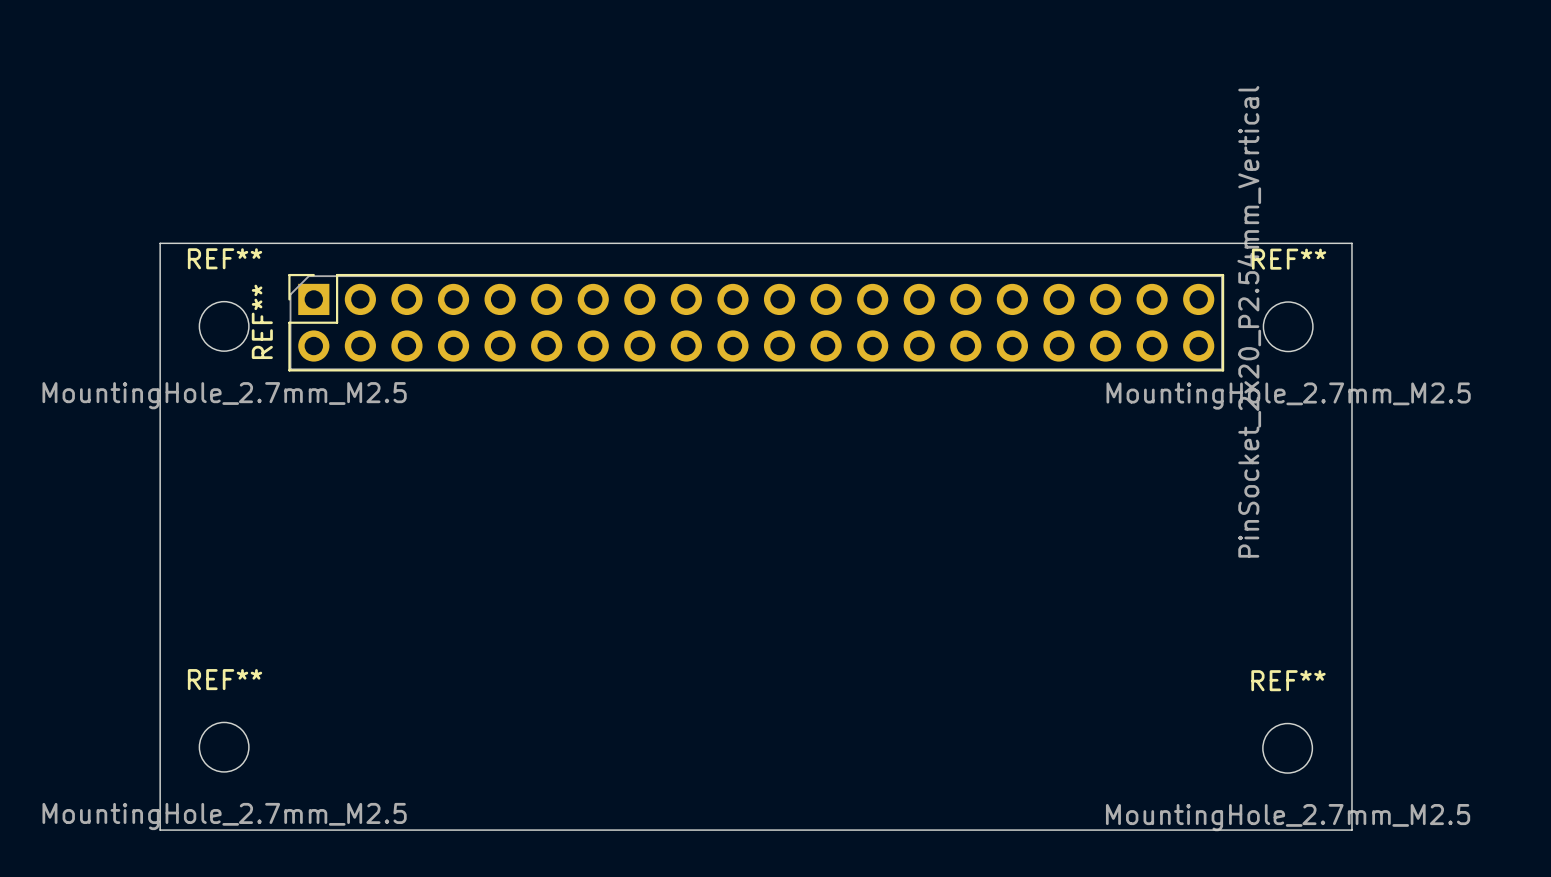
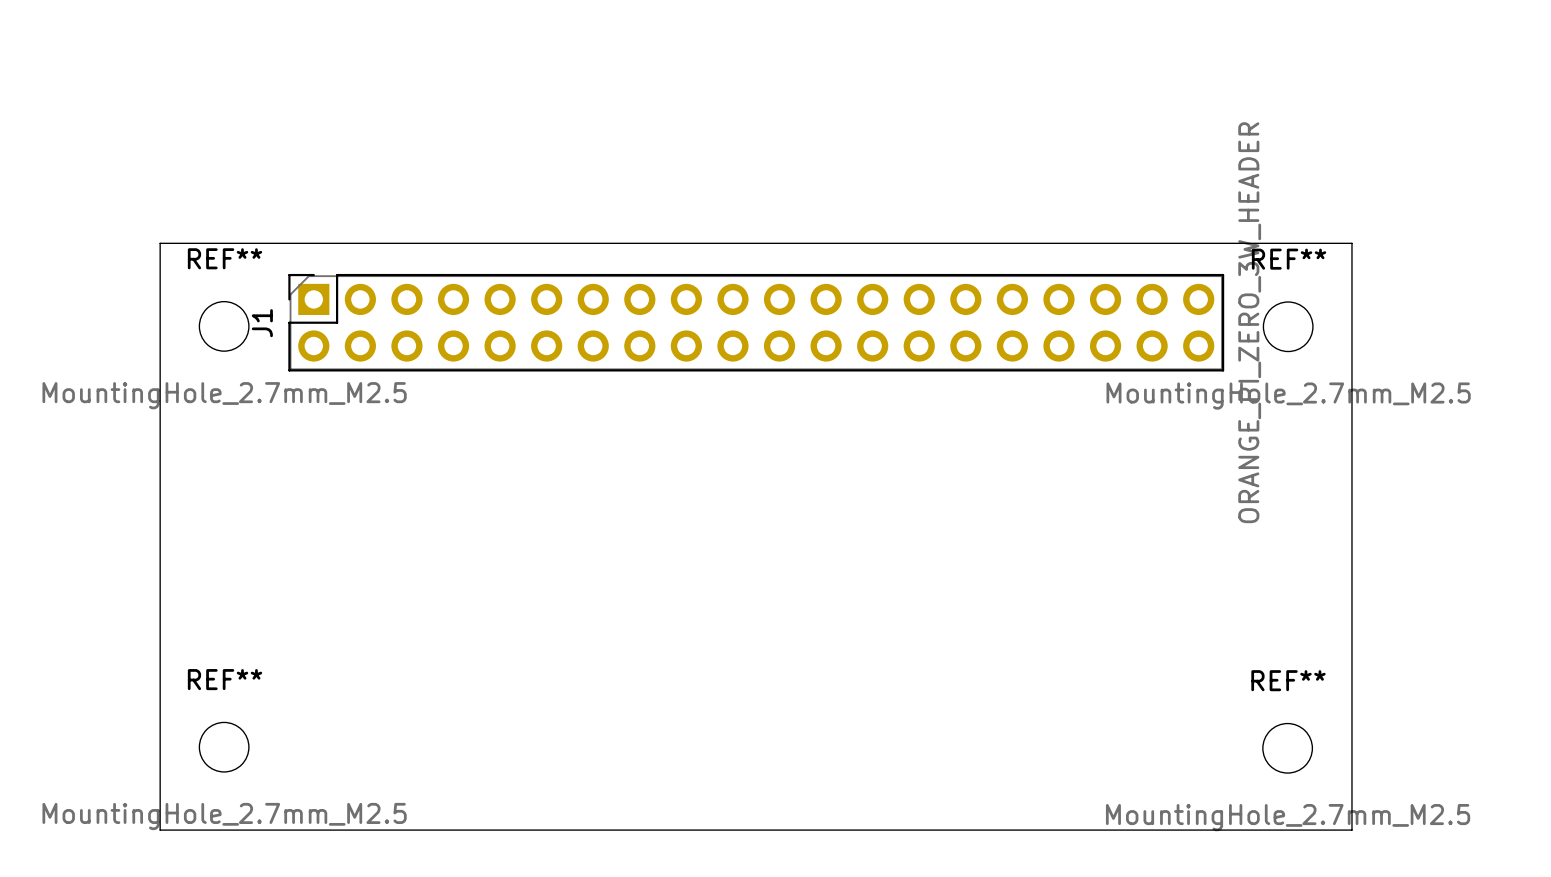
REF** name: REF** (262, 321) -> J1 (262, 323)
REF** value: PinSocket_2x20_P2.54mm_Vertical (1249, 321) -> ORANGE_PI_ZERO_3W_HEADER (1249, 322)

